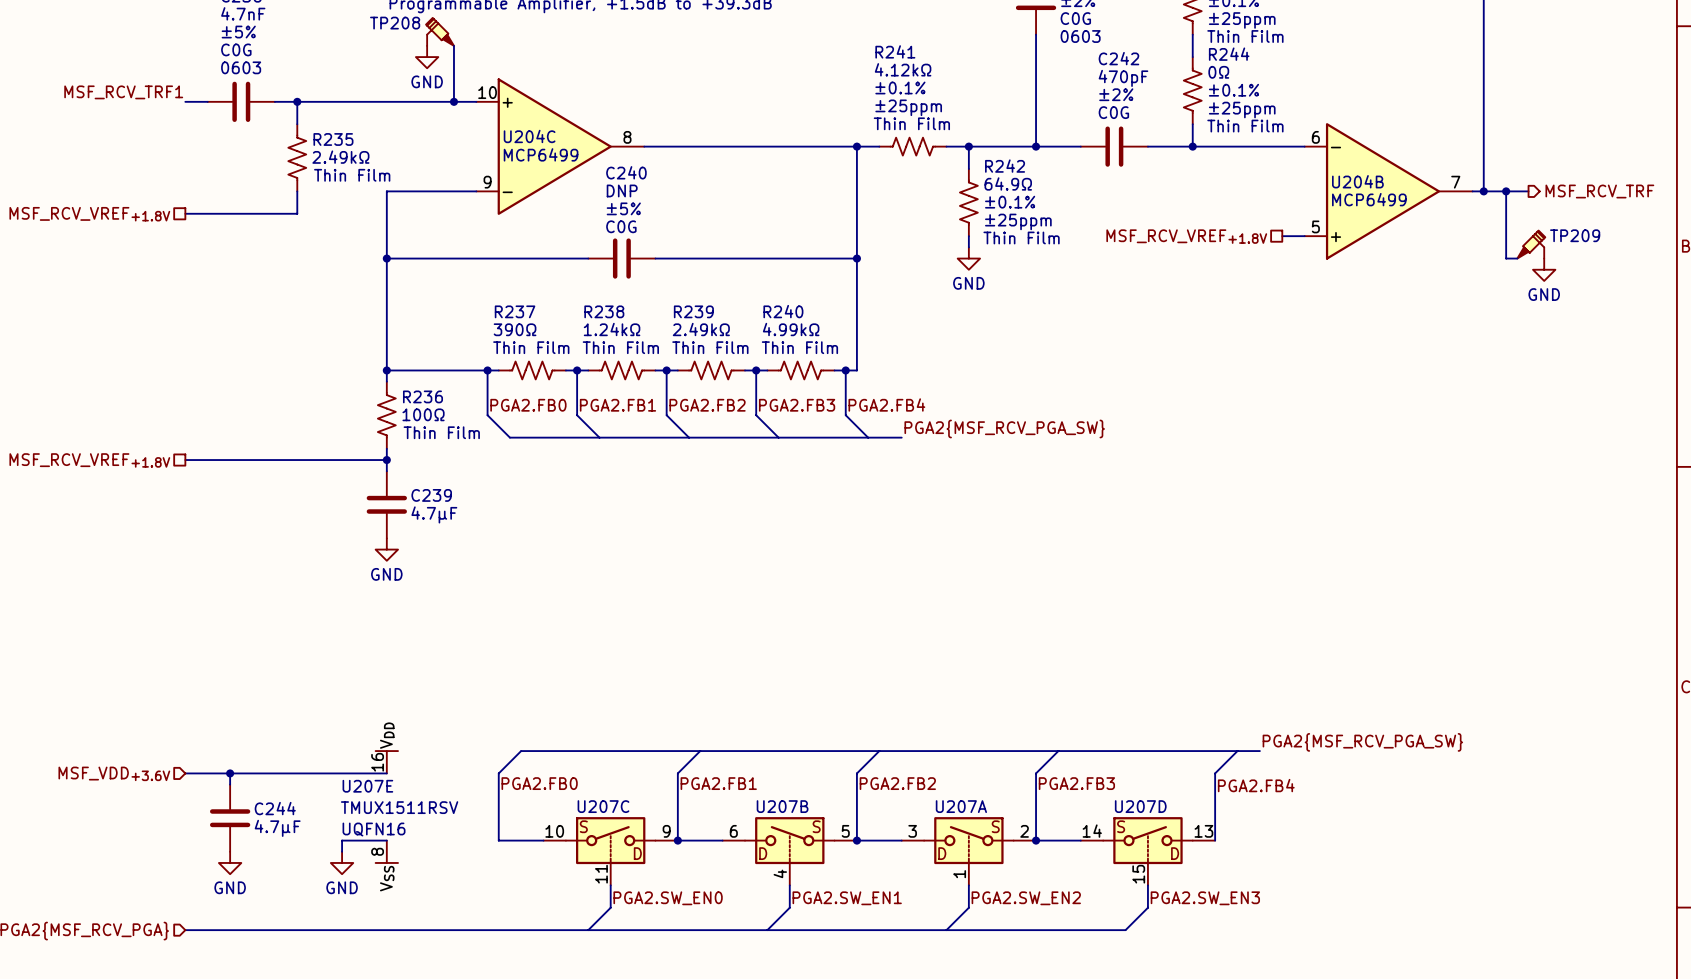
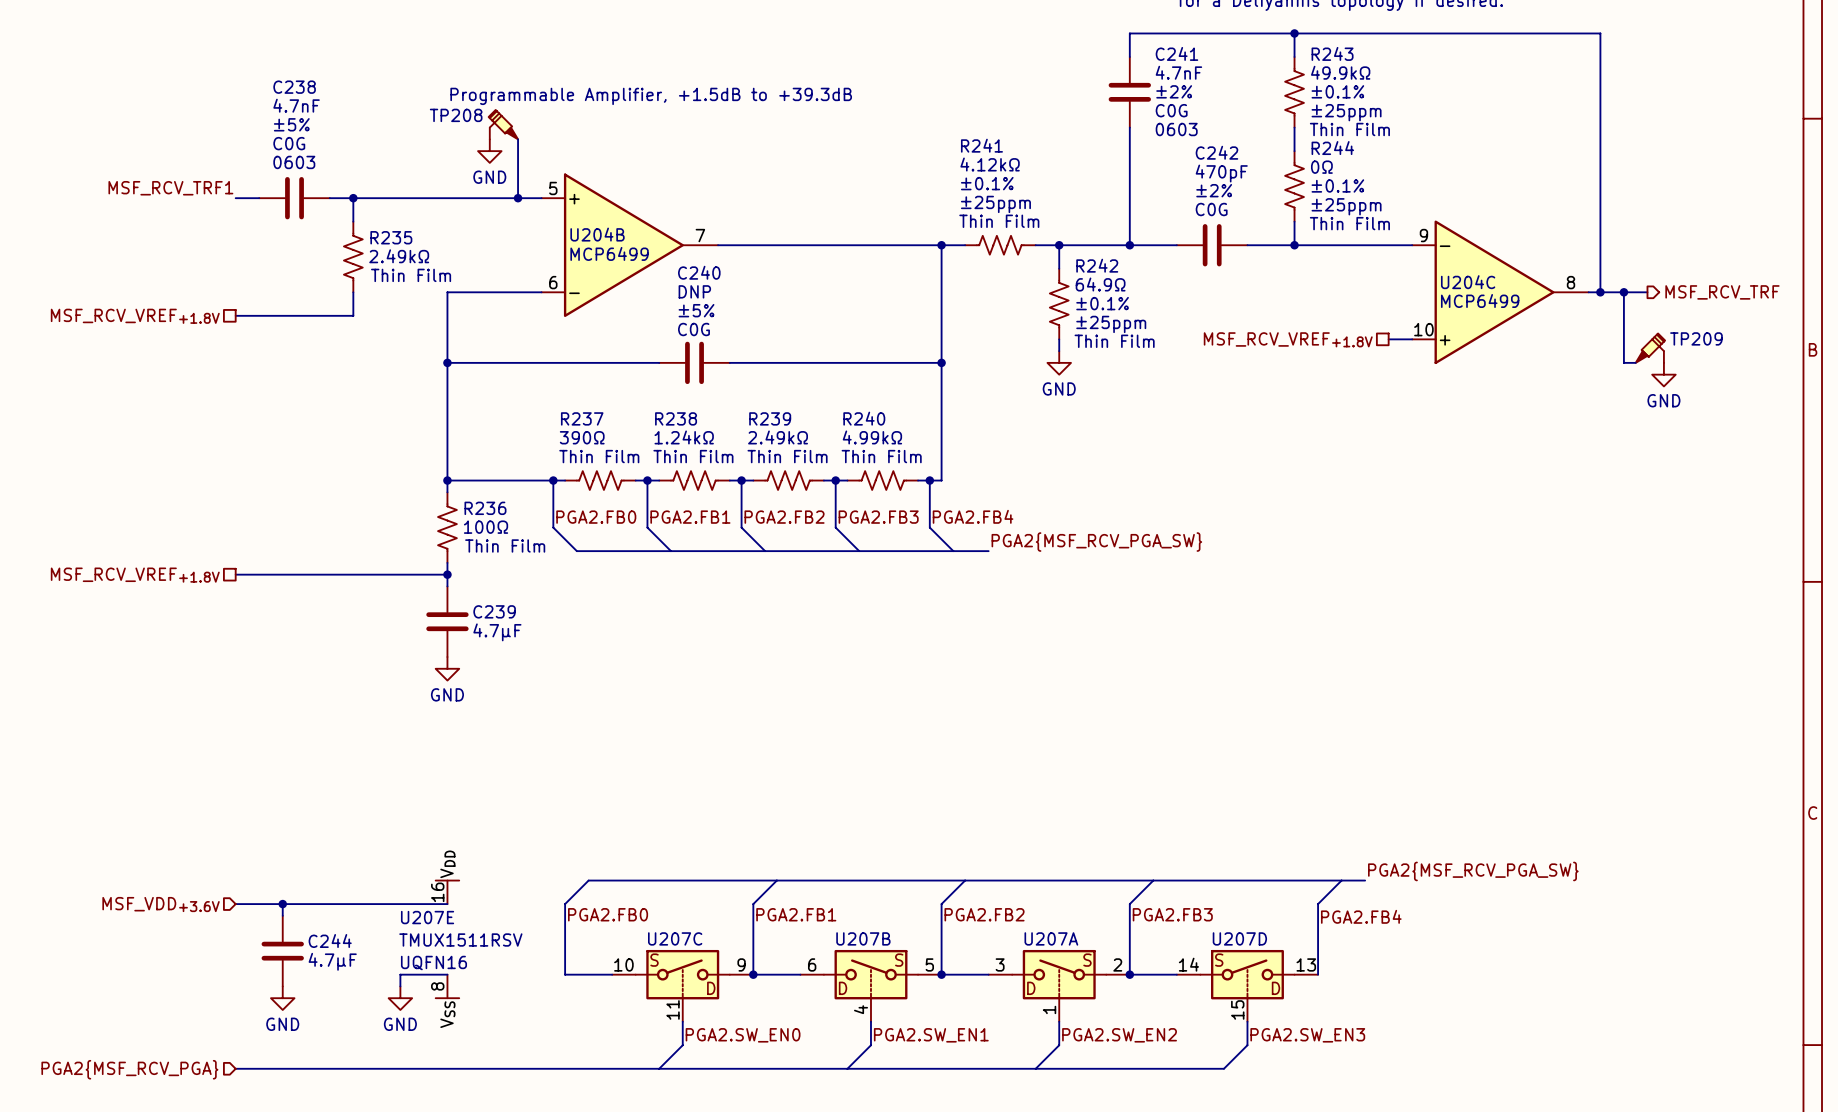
U204C flip: as is (554, 146) -> up-down (1494, 292)
U204C position: (560, 146) -> (1500, 292)
U204B flip: as is (1383, 191) -> up-down (623, 245)
U204B position: (1388, 191) -> (629, 245)

